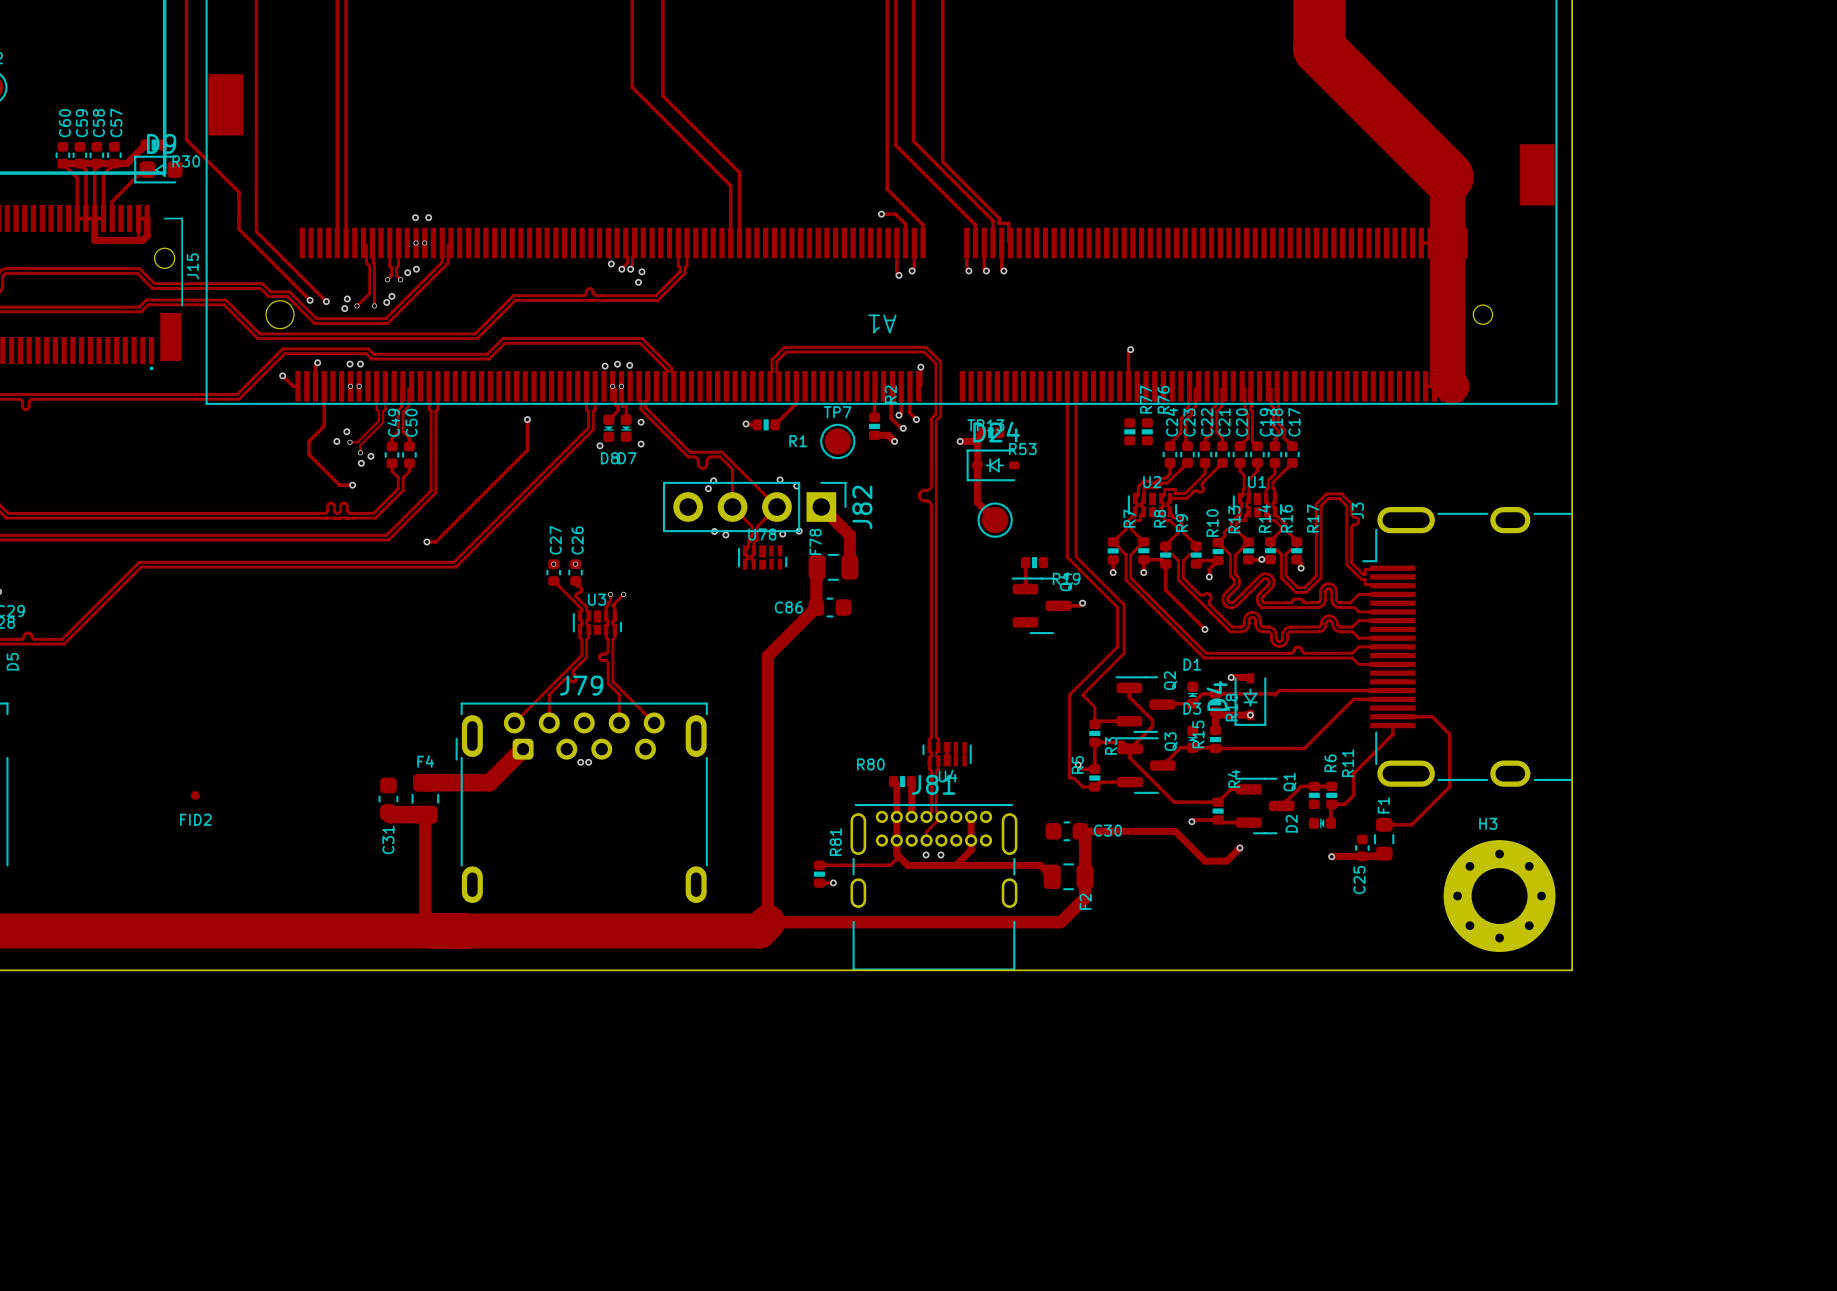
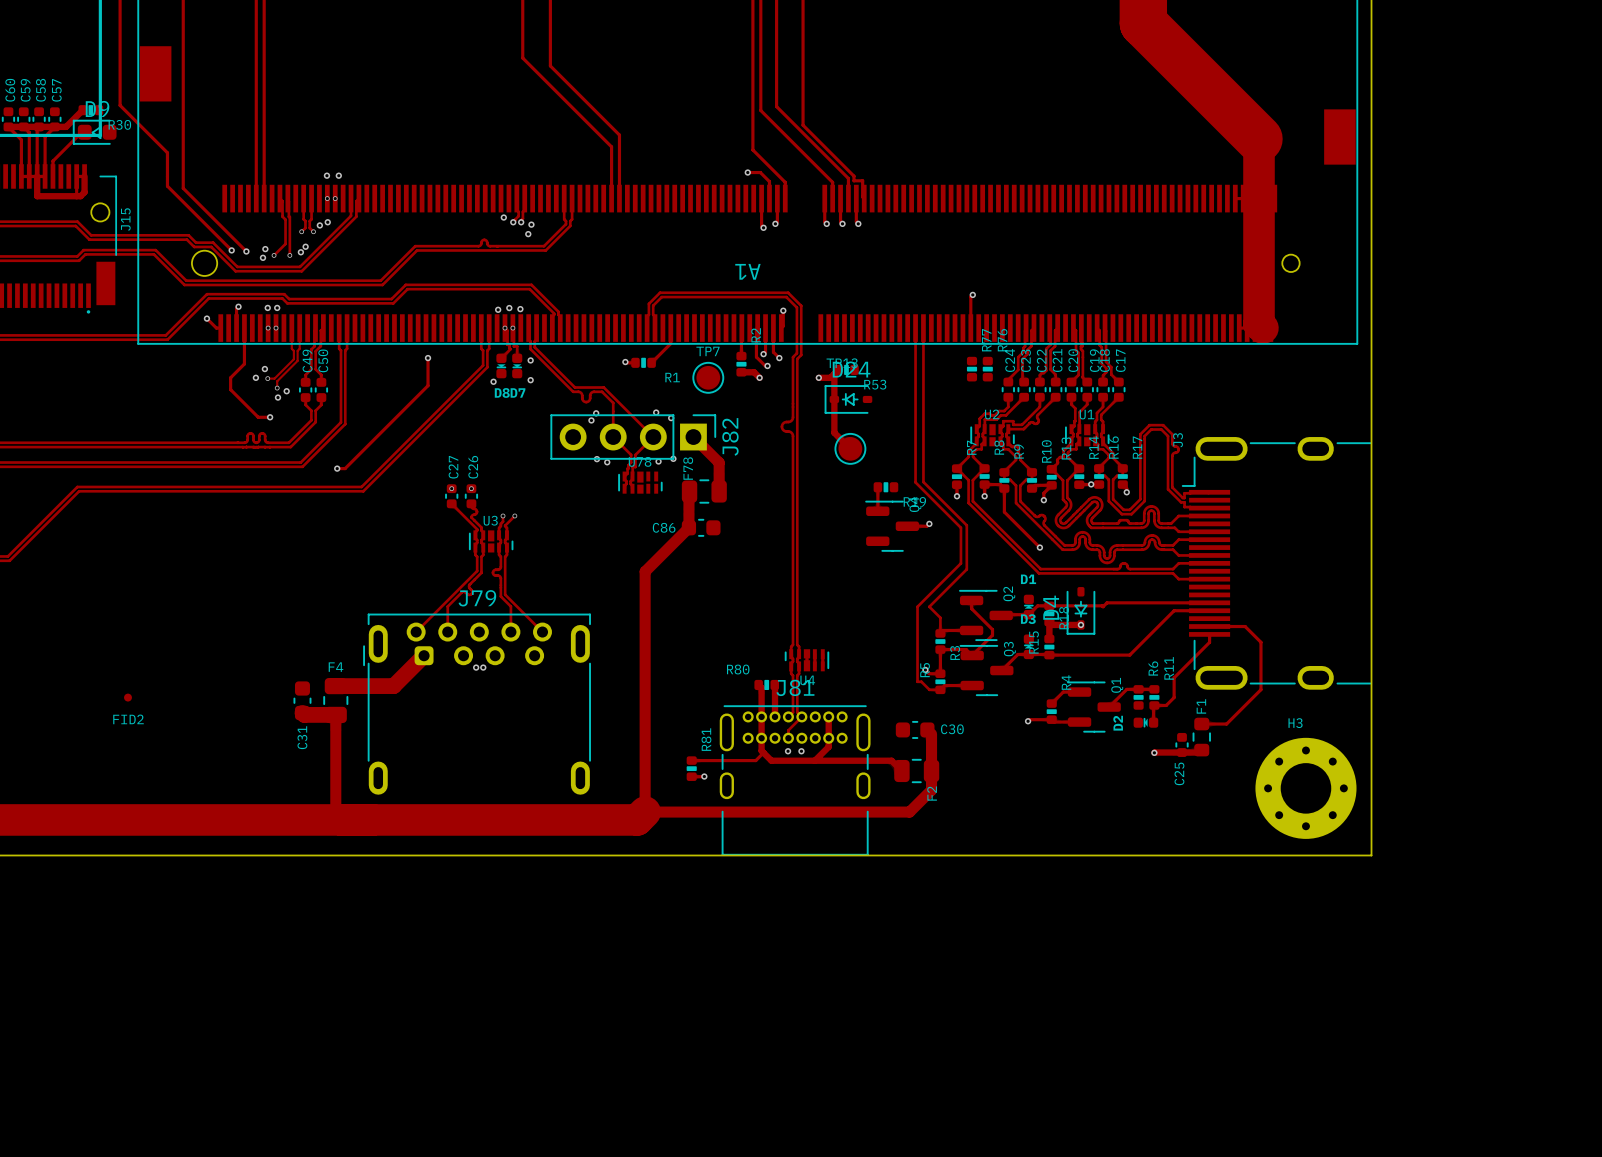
track: (1231, 677) (1250, 678) -> none
via: (1231, 677) -> none
track: (1130, 748) (1130, 758) (1174, 802) (1218, 802) -> none
track: (1080, 831) (1175, 831) (1204, 861) (1226, 861) (1239, 847) -> none
via: (1239, 847) -> none

